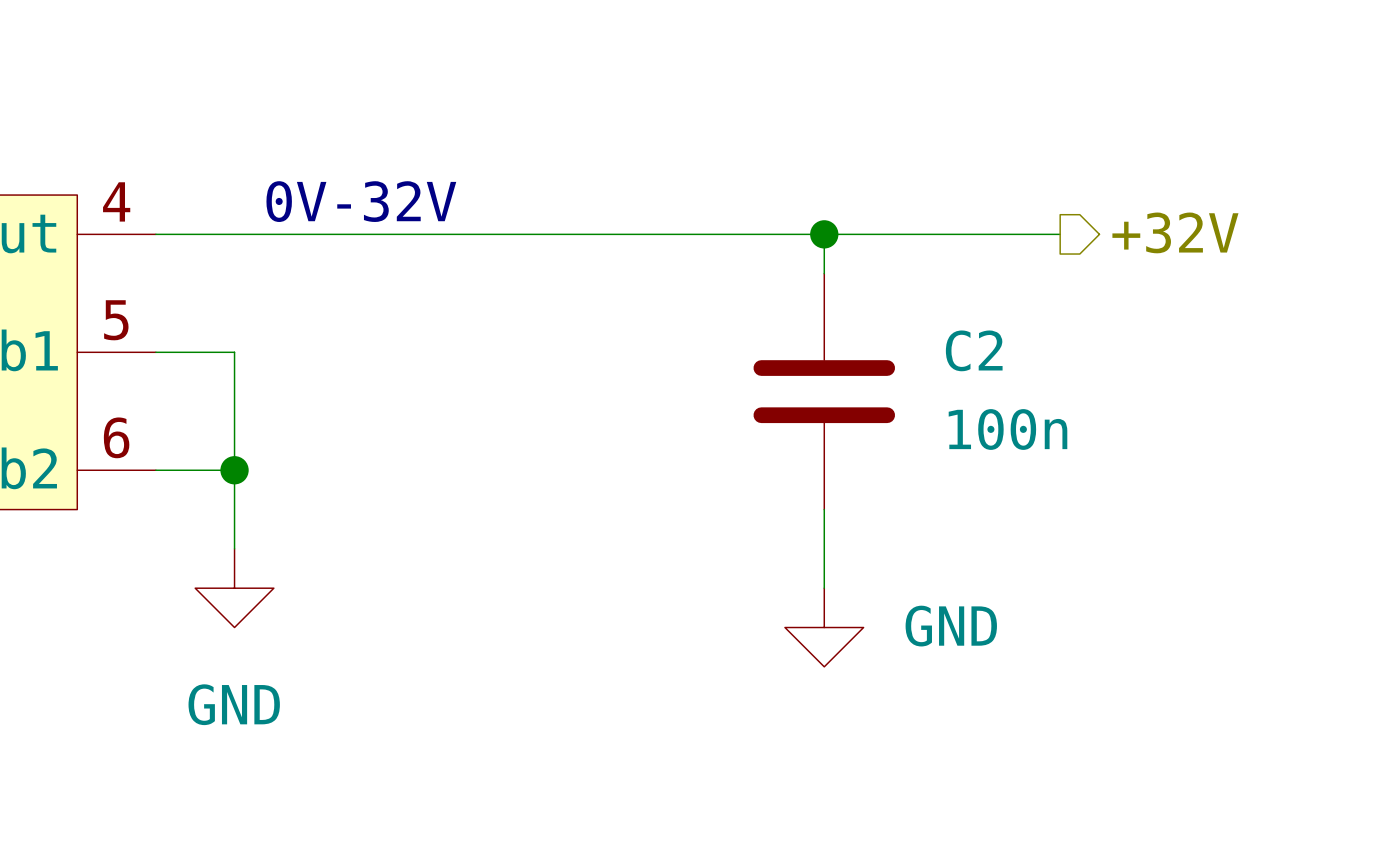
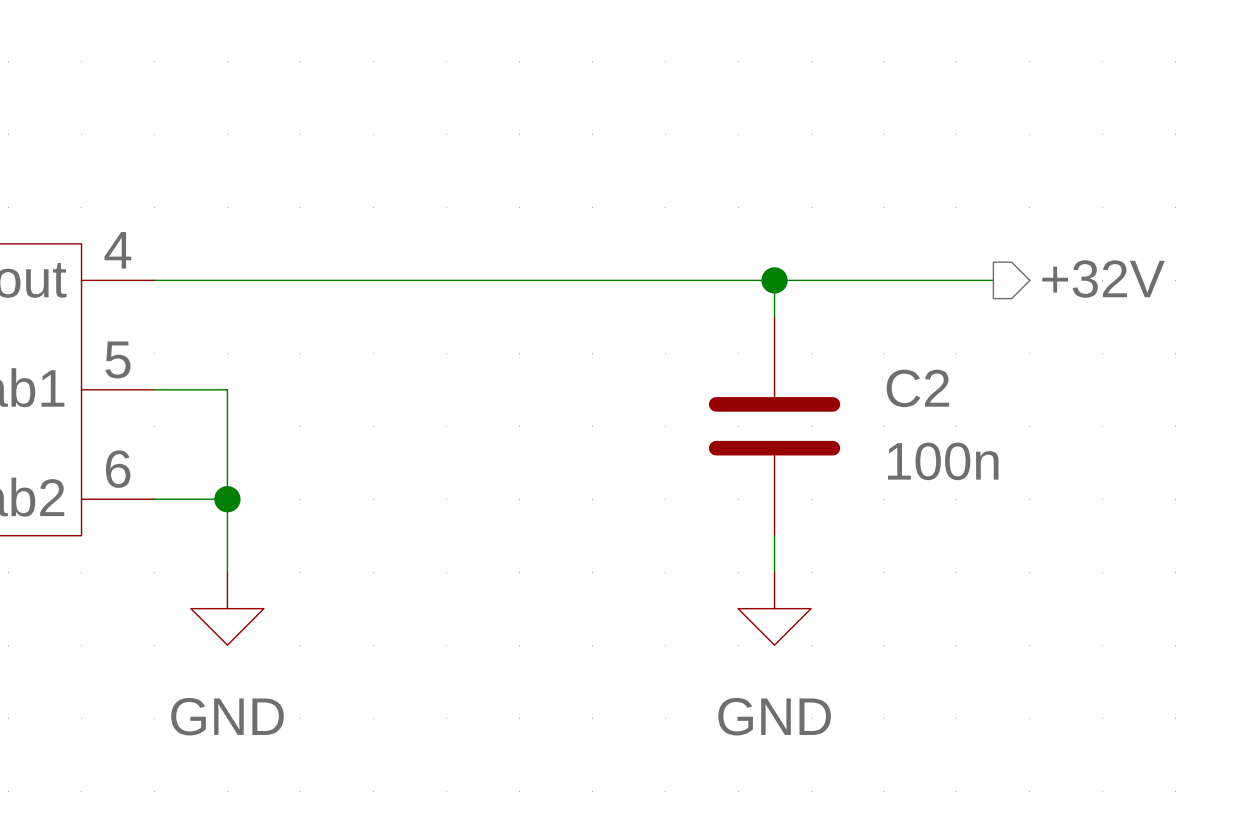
text: 0V-32V (361, 201) -> none
power symbol text position: GND (951, 626) -> GND (774, 716)
power symbol position: GND (824, 627) -> GND (774, 608)

